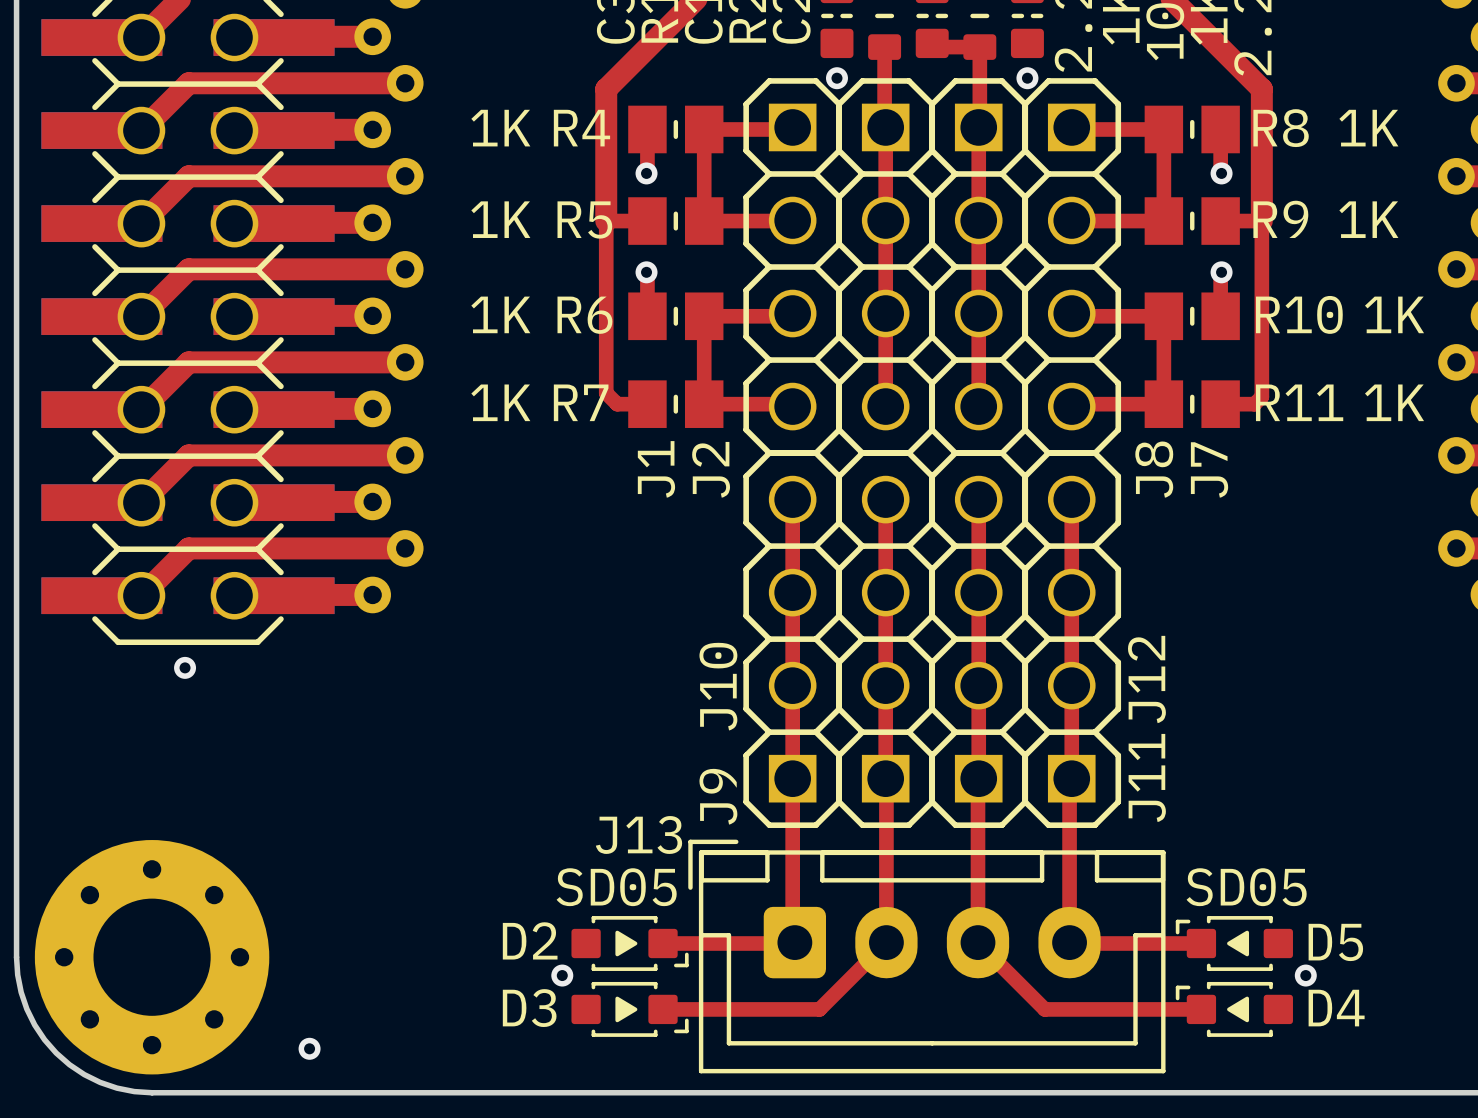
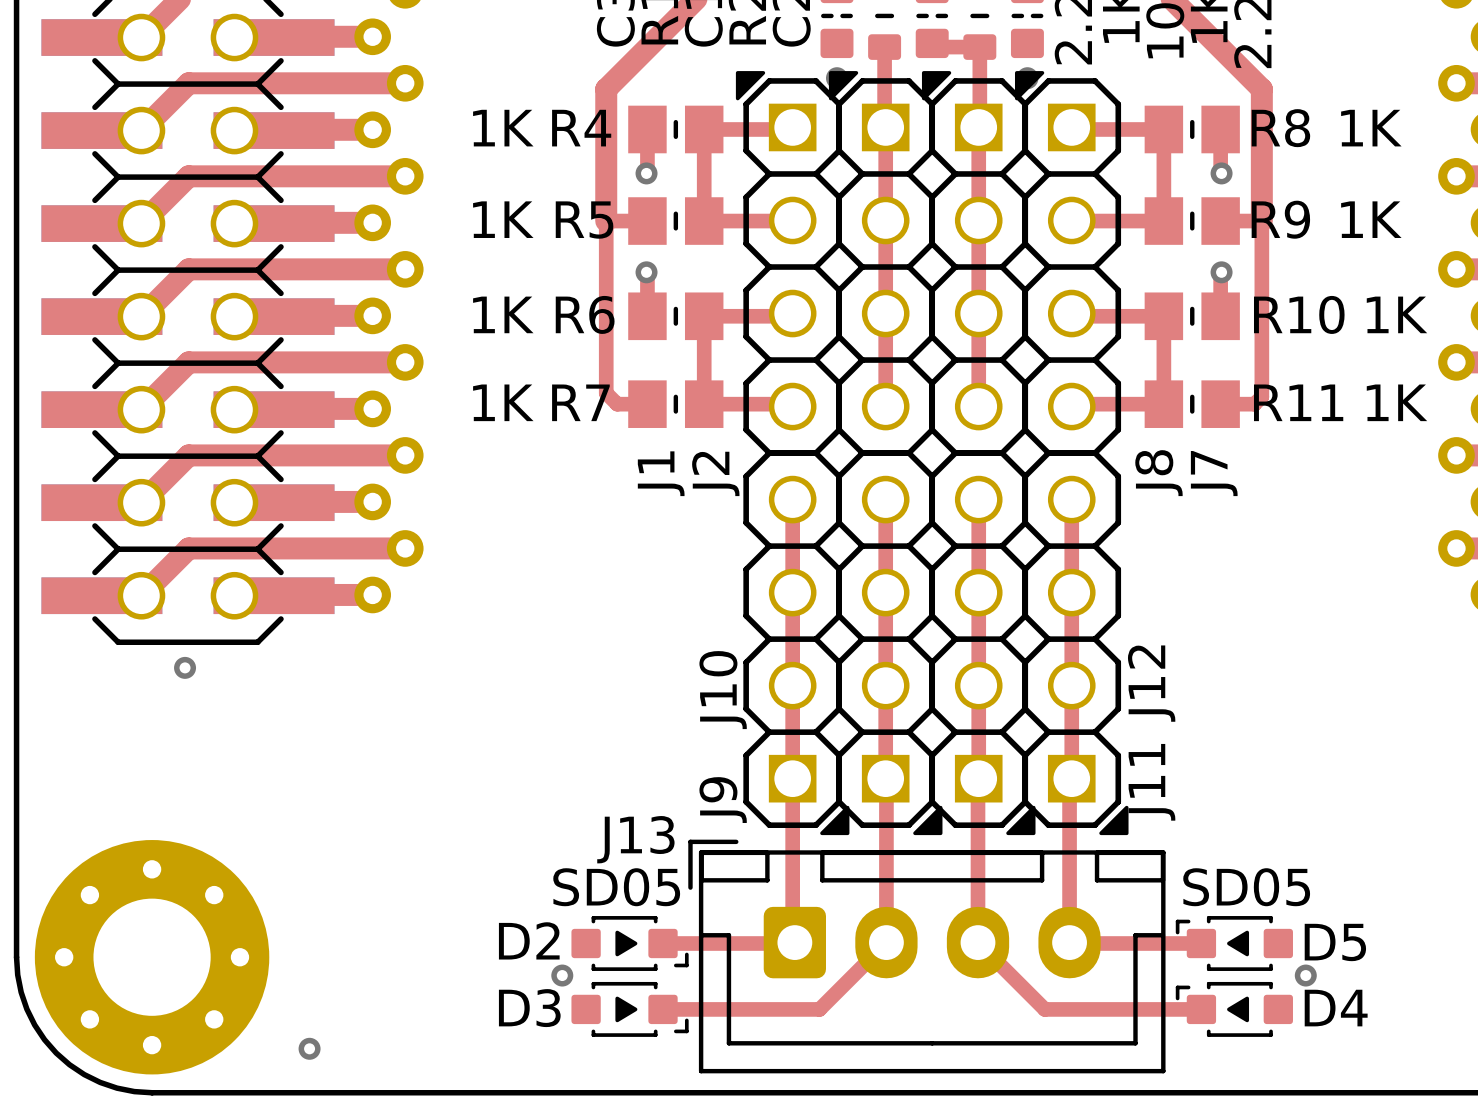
J1 footprint: [743, 78, 842, 456] -> [735, 71, 842, 456]
J2 footprint: [836, 78, 936, 456] -> [828, 71, 936, 456]
J7 footprint: [929, 78, 1029, 456] -> [921, 71, 1029, 456]
J8 footprint: [1022, 78, 1122, 456] -> [1014, 71, 1122, 456]
J9 footprint: [743, 450, 842, 828] -> [743, 450, 850, 836]
J10 footprint: [836, 450, 936, 828] -> [836, 450, 943, 836]
J11 footprint: [929, 450, 1029, 828] -> [929, 450, 1036, 836]
J12 footprint: [1022, 450, 1122, 828] -> [1022, 450, 1129, 836]

